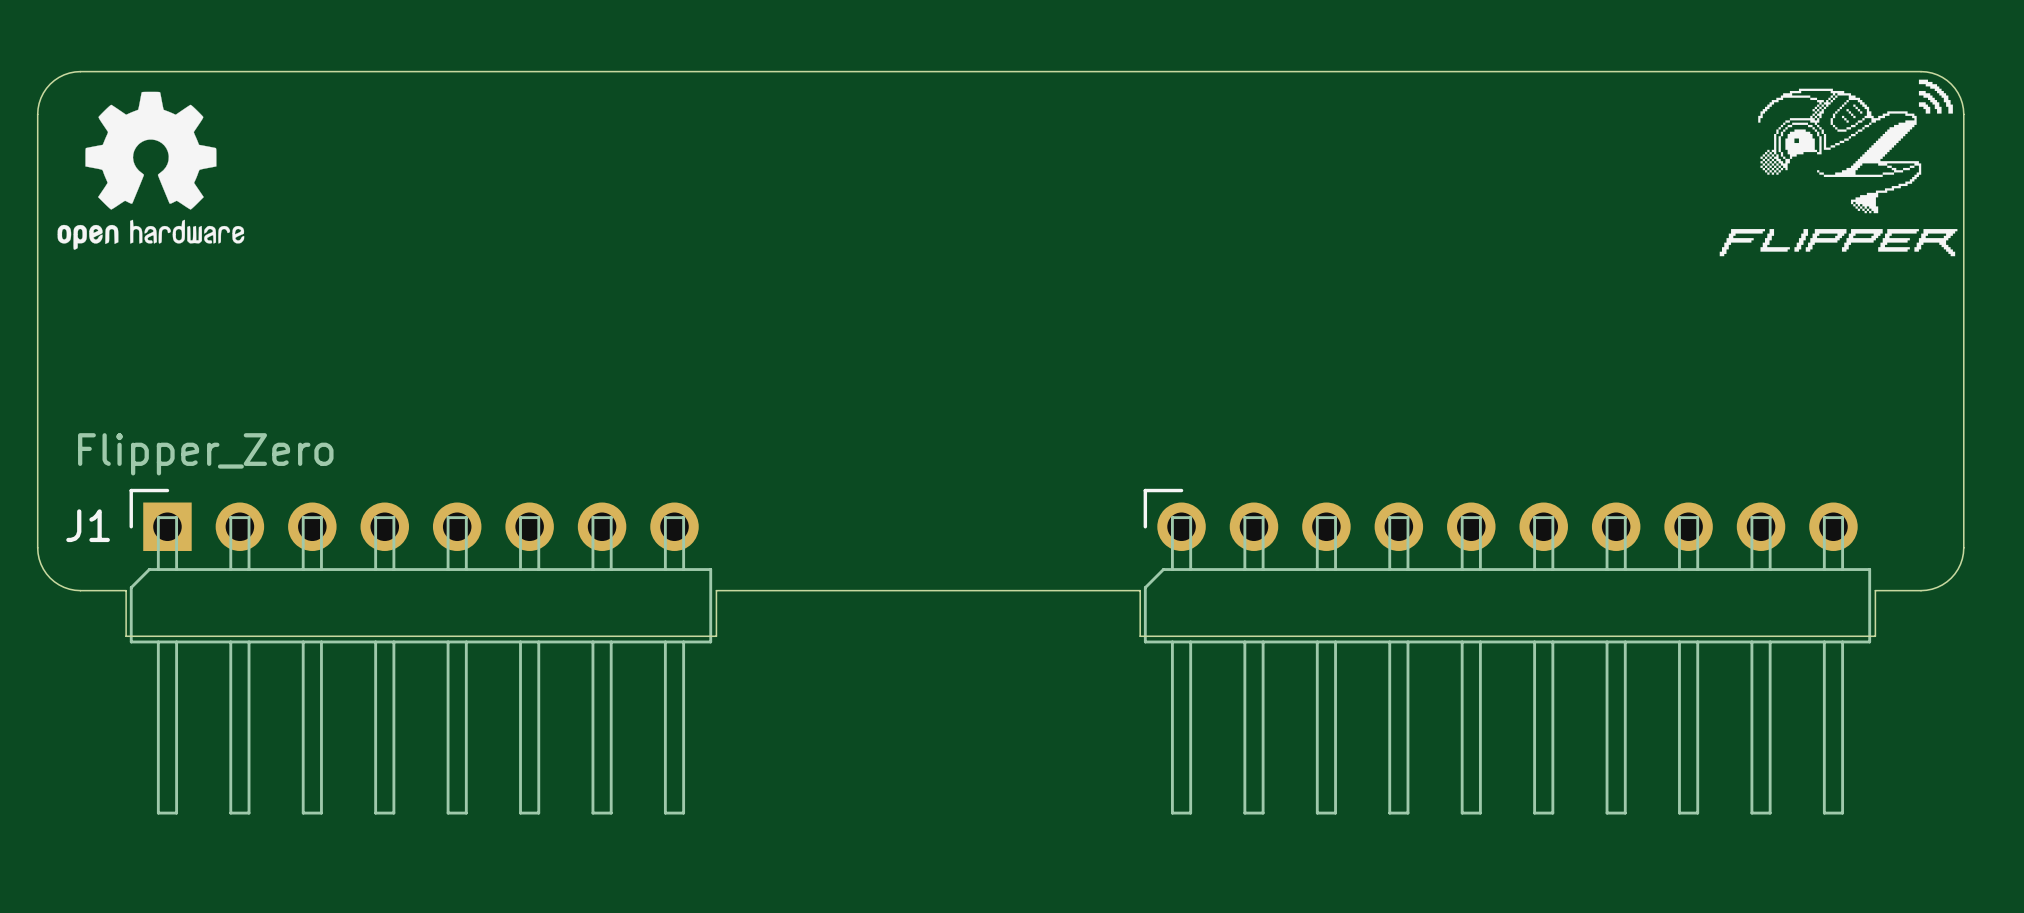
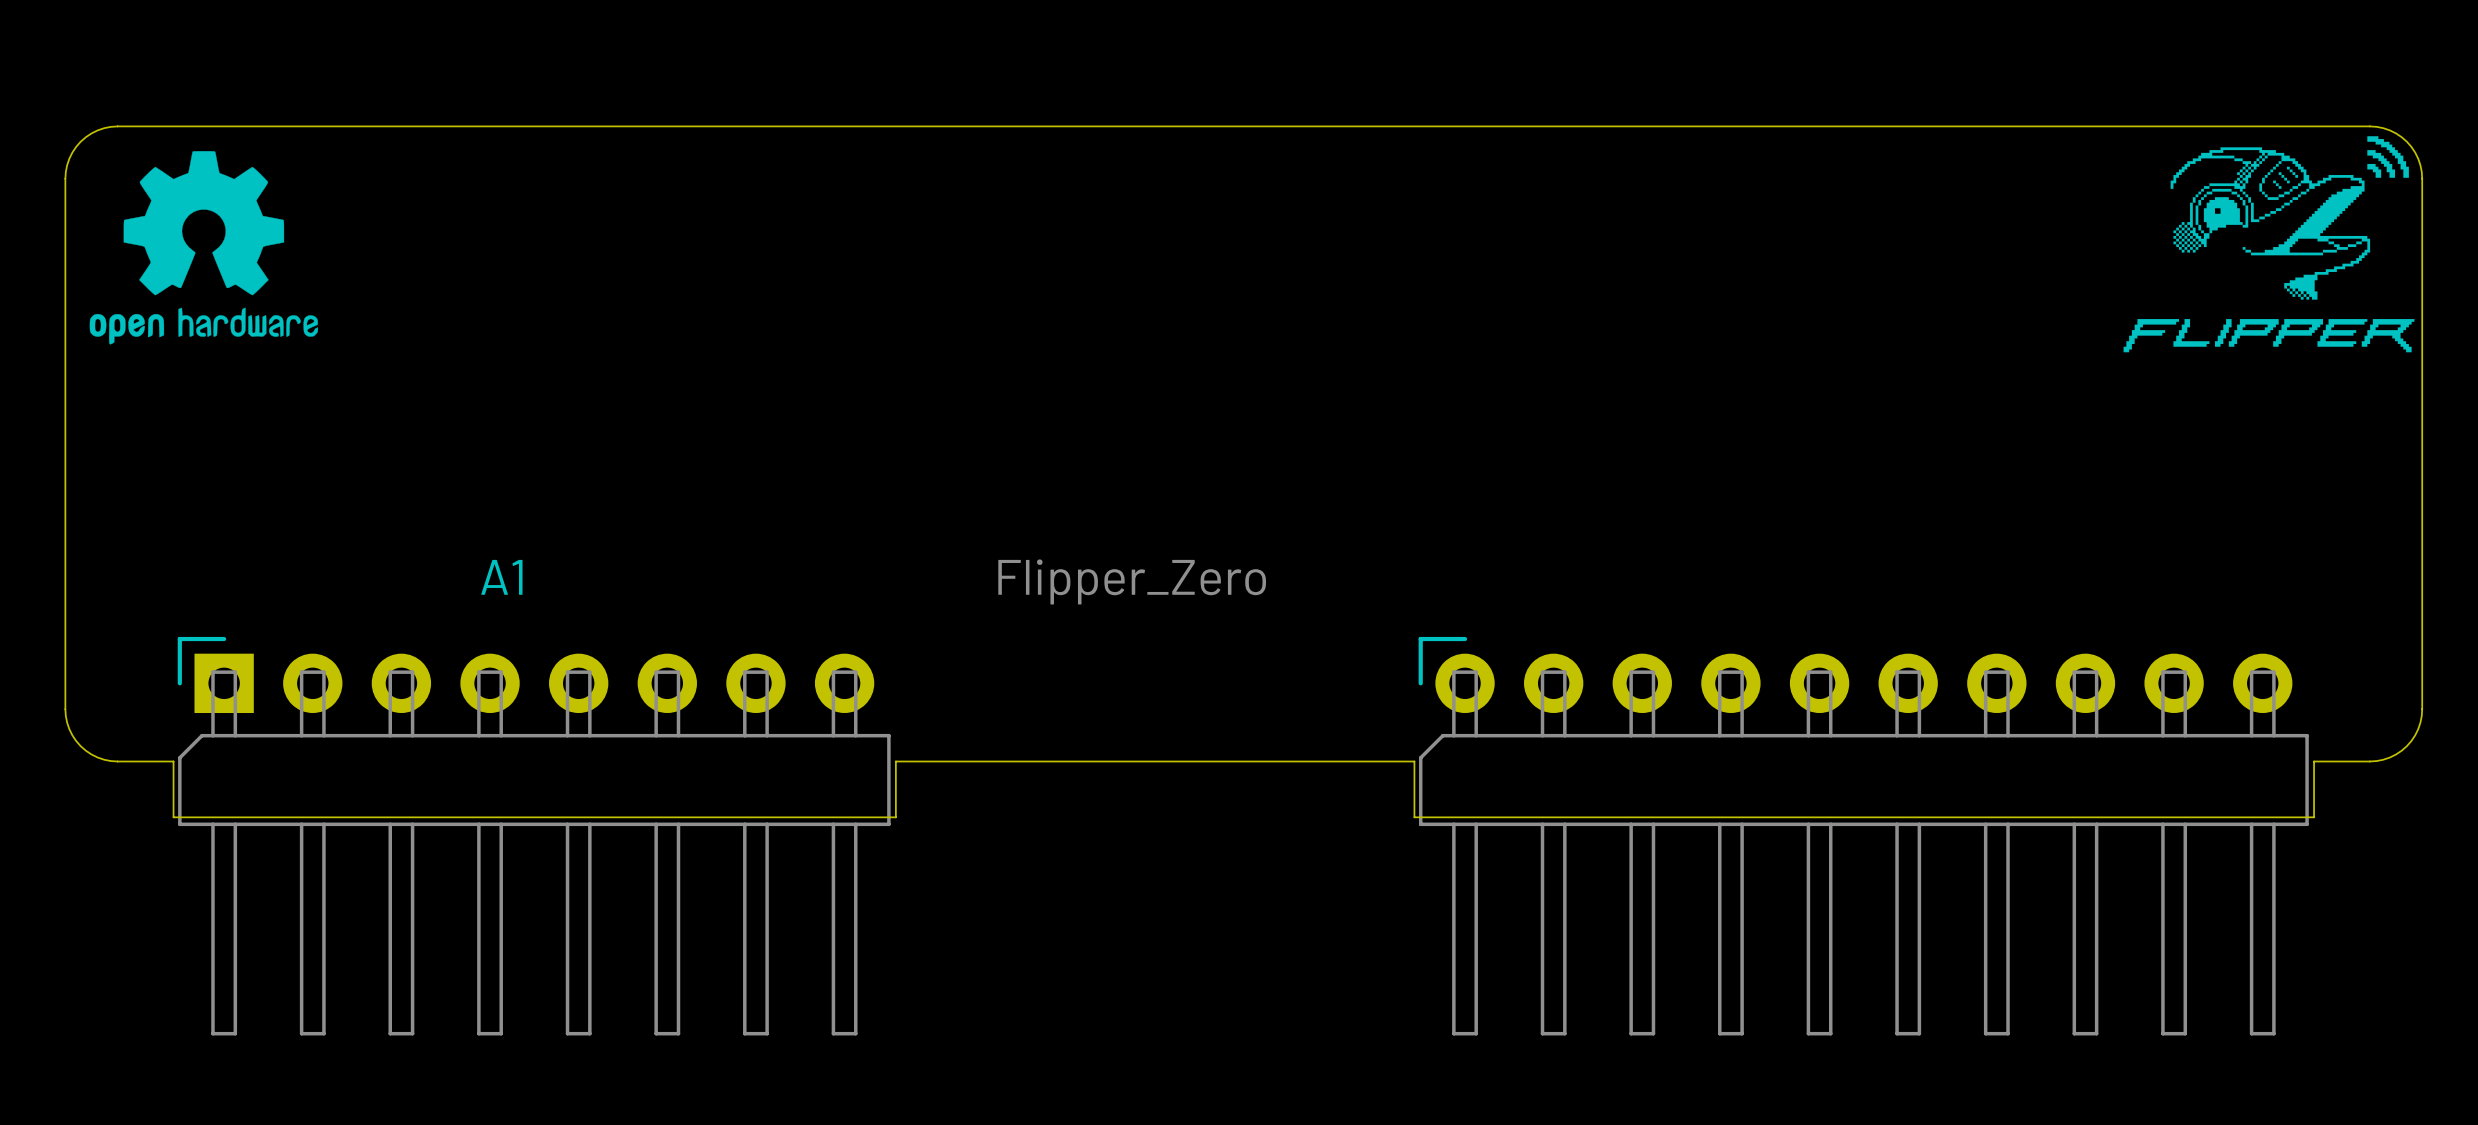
J1: Flipper_Zero (1000, 651) -> none
A1: none -> Flipper_Zero (1243, 836)

